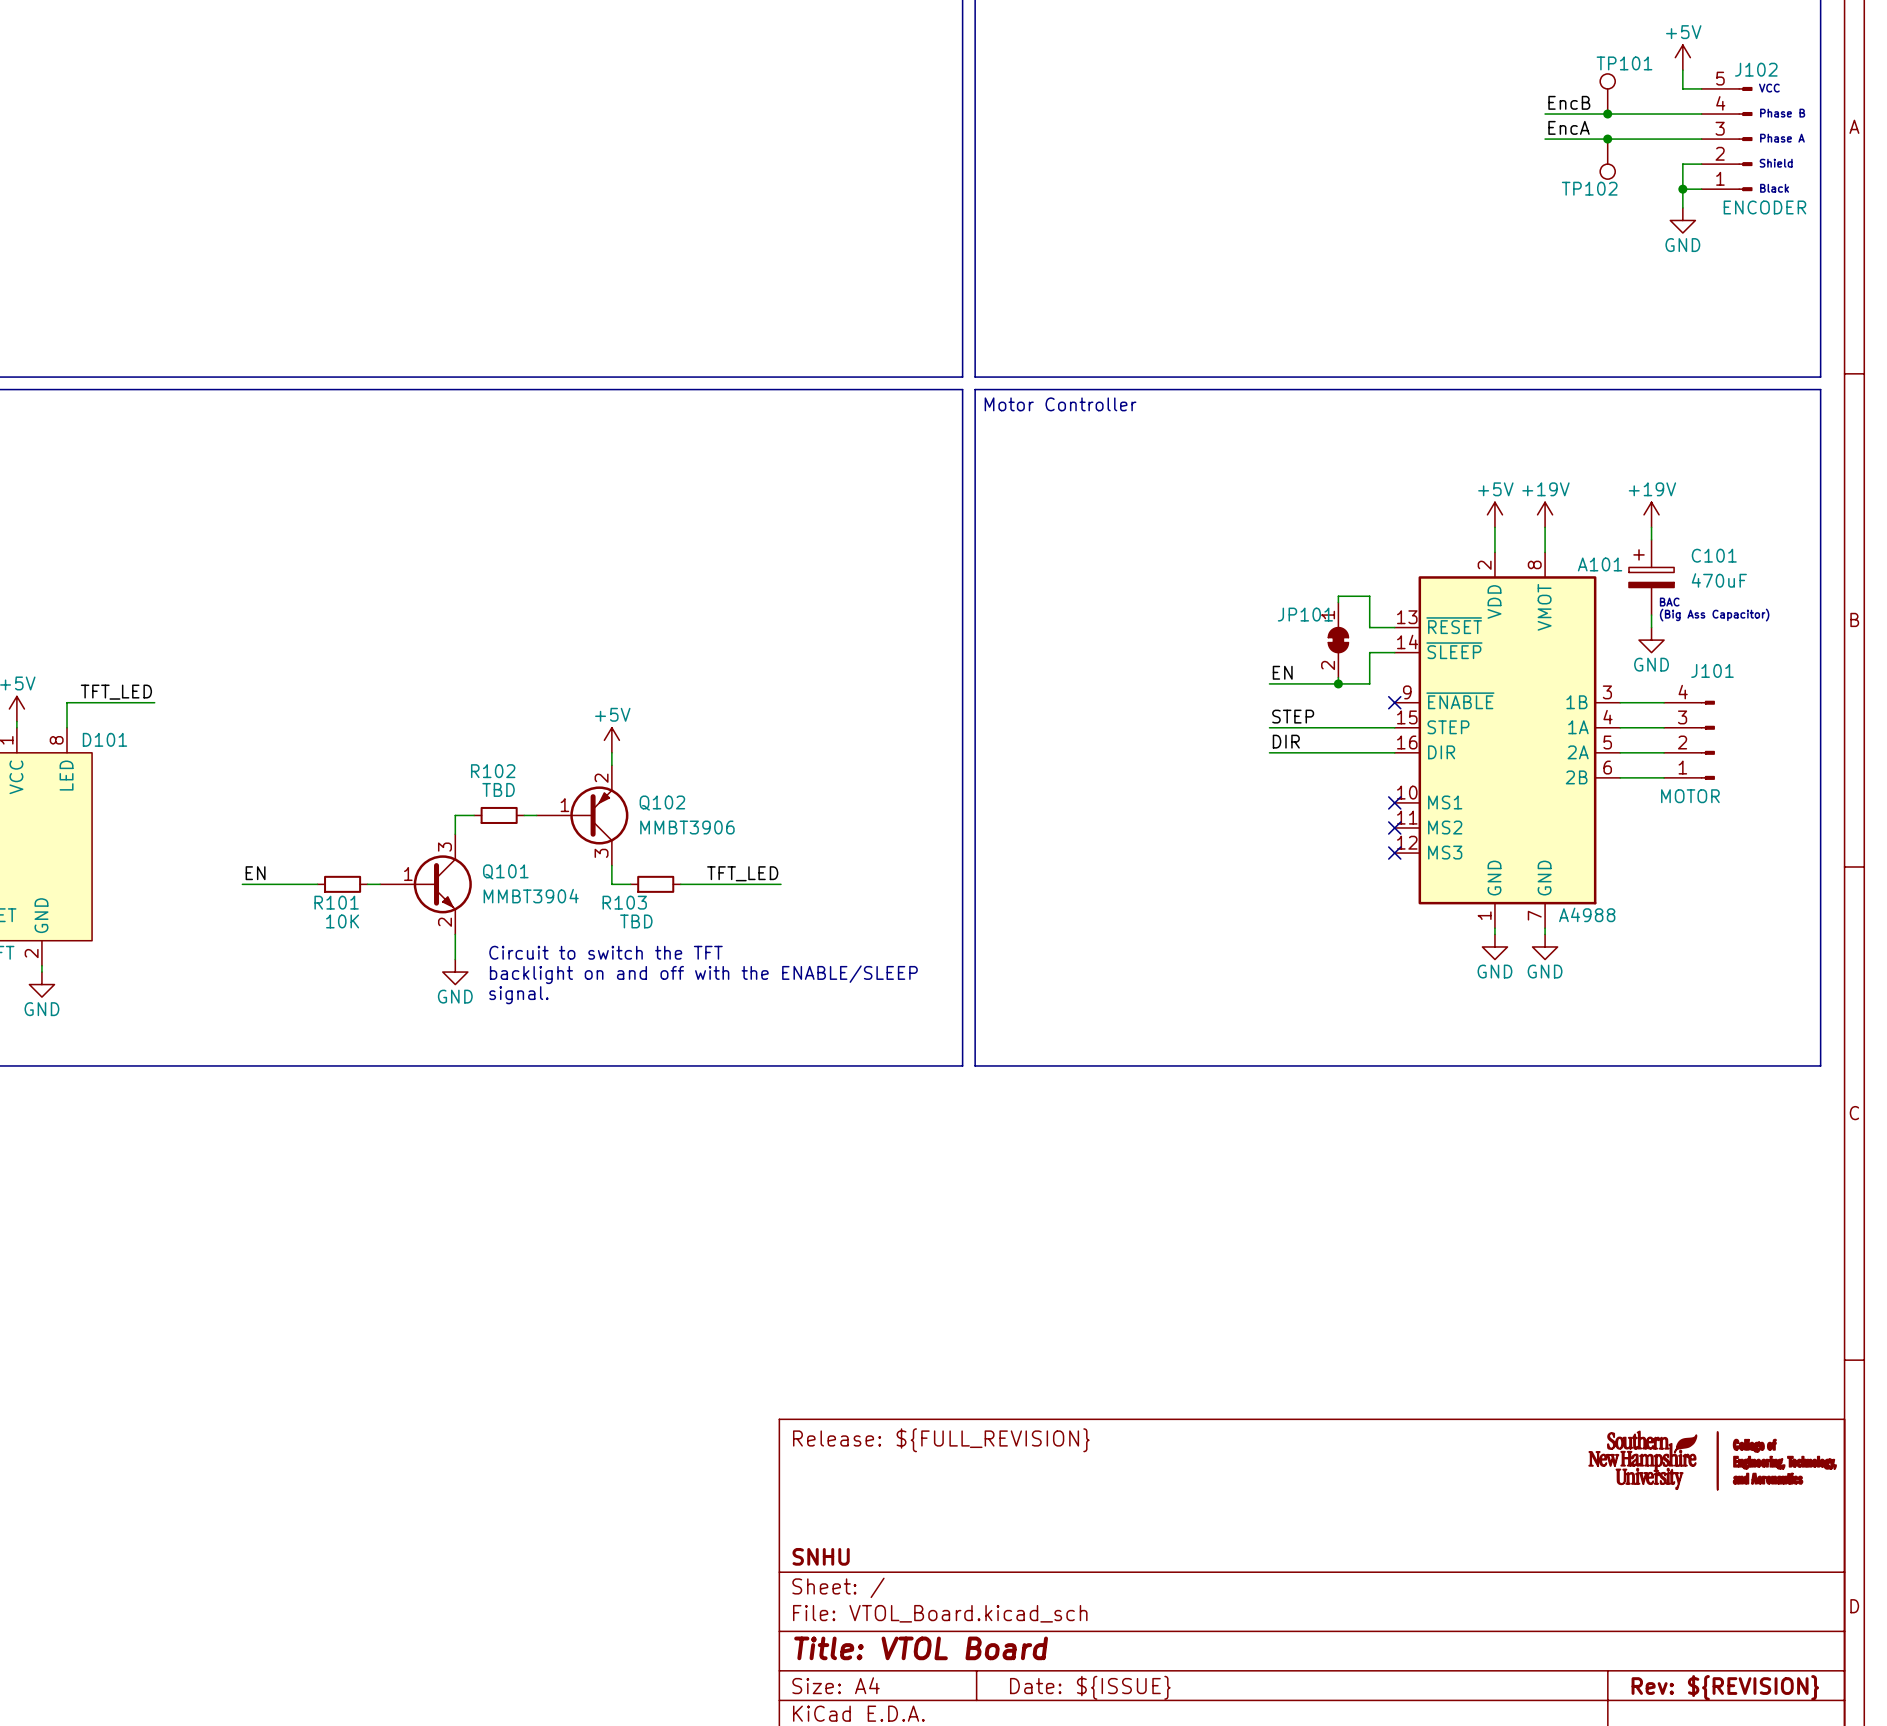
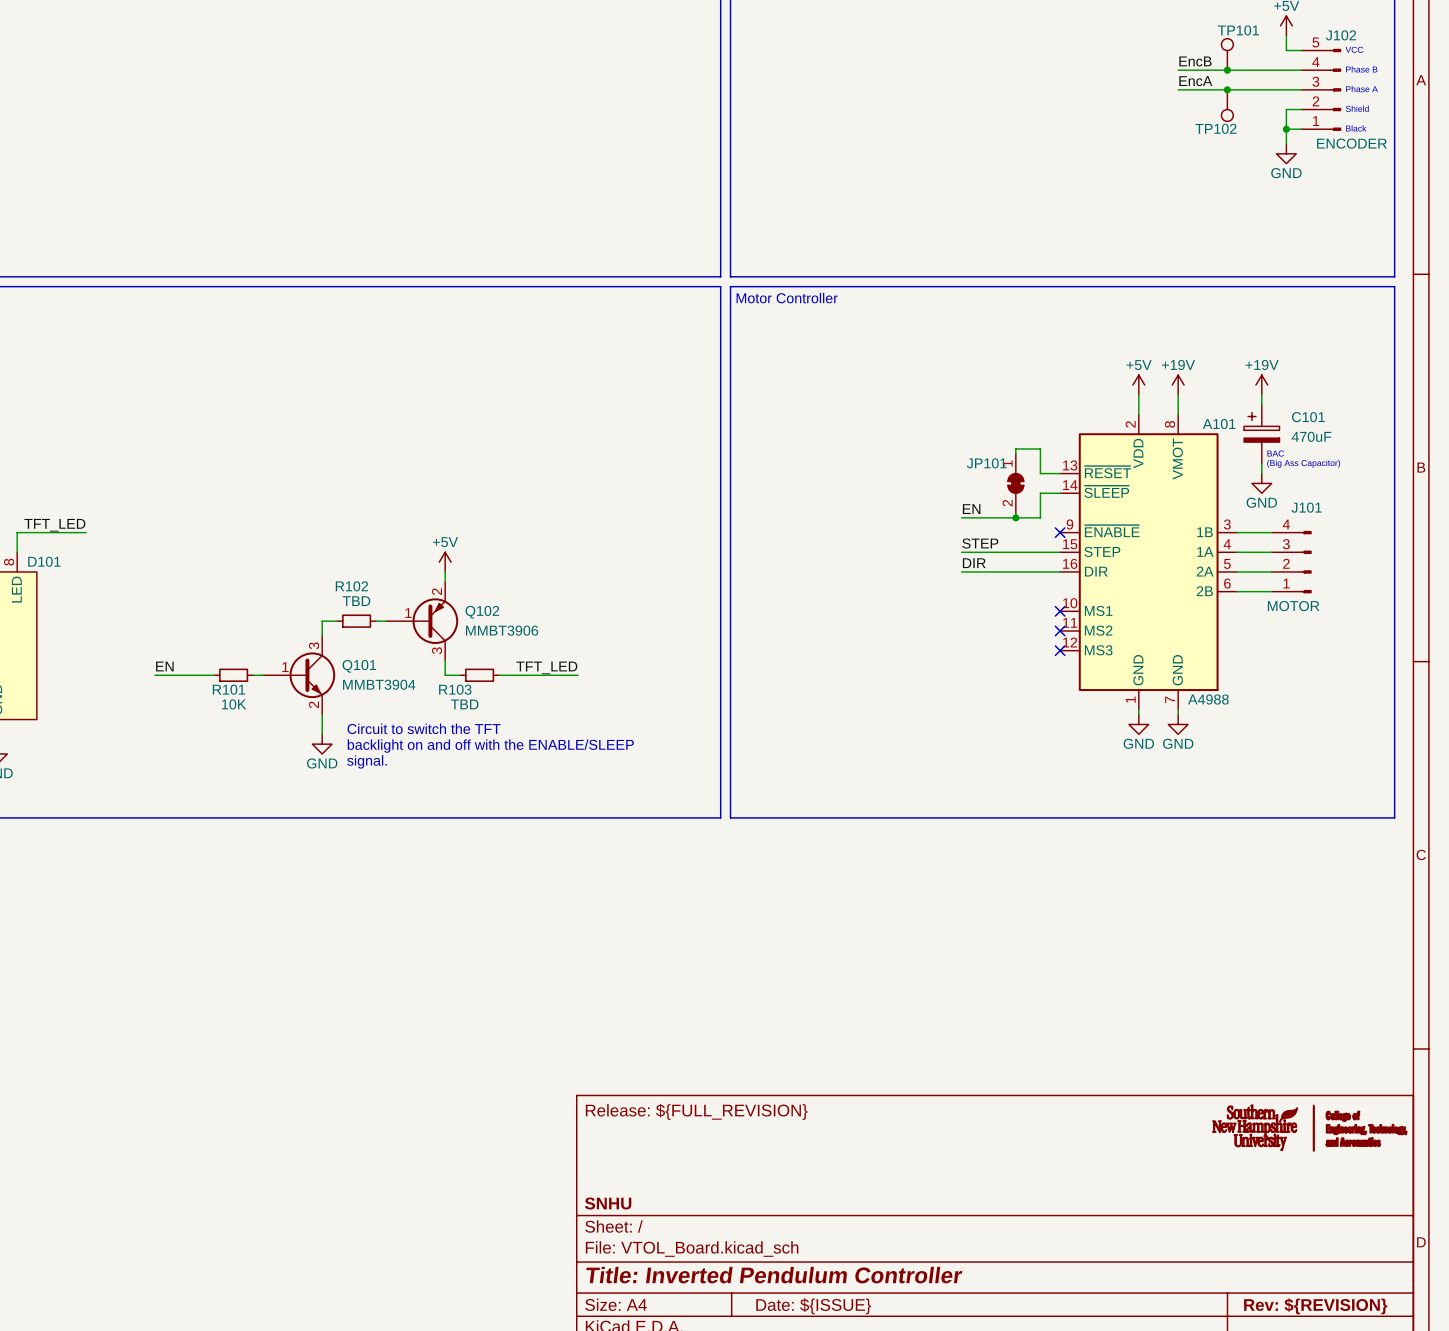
title block: Title: VTOL Board (921, 1648) -> Title: Inverted Pendulum Controller (774, 1275)

